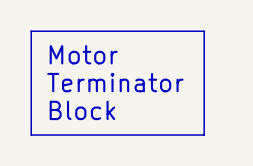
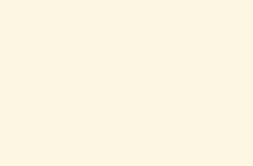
line: (31, 31) (204, 31) (204, 135) (31, 135) (31, 31) -> none
text: Motor (83, 54) -> none
text: Terminator (115, 82) -> none
text: Block (82, 110) -> none

